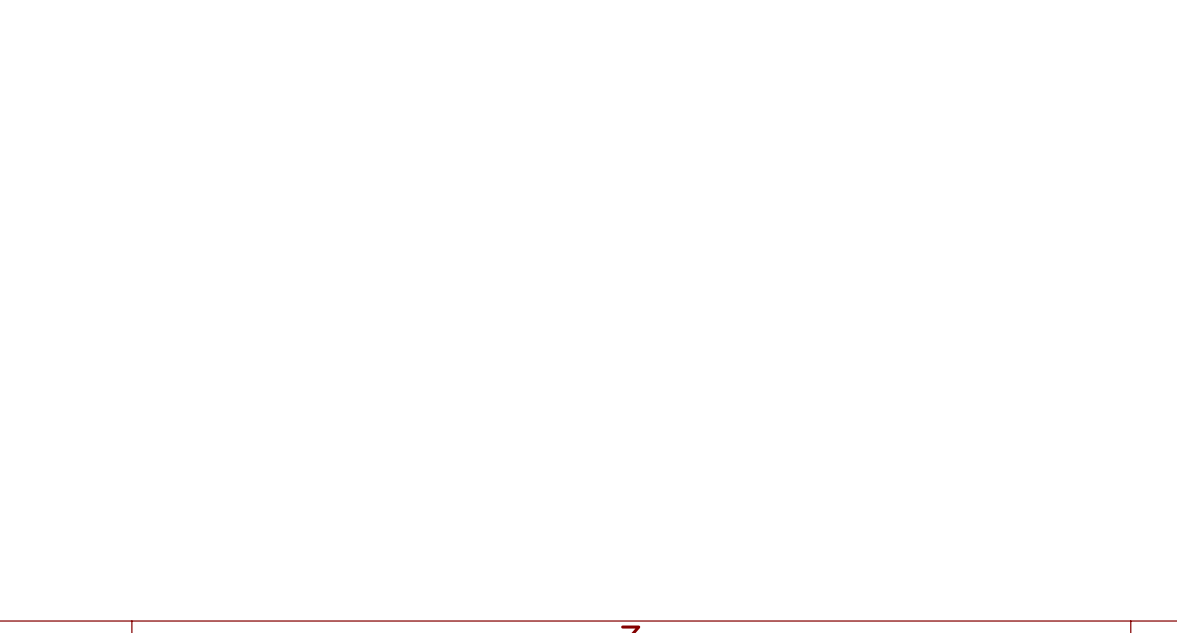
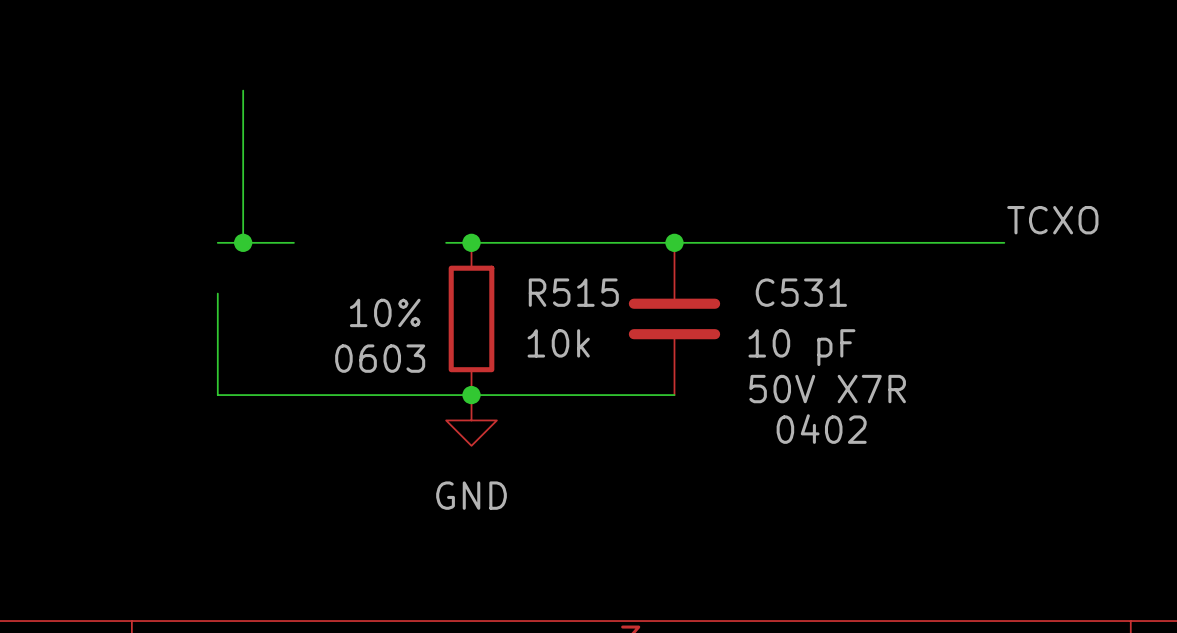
wire: none -> (243, 90) (243, 242)
label: none -> TCXO (1052, 220)
wire: none -> (217, 242) (293, 242)
junction: none -> (243, 242)
wire: none -> (446, 242) (1004, 242)
junction: none -> (471, 242)
junction: none -> (674, 242)
wire: none -> (217, 293) (217, 395) (674, 395)
R515: none -> 10k (471, 318)
C531: none -> 10 pF (674, 318)
junction: none -> (471, 395)
power symbol: none -> GND (471, 420)

